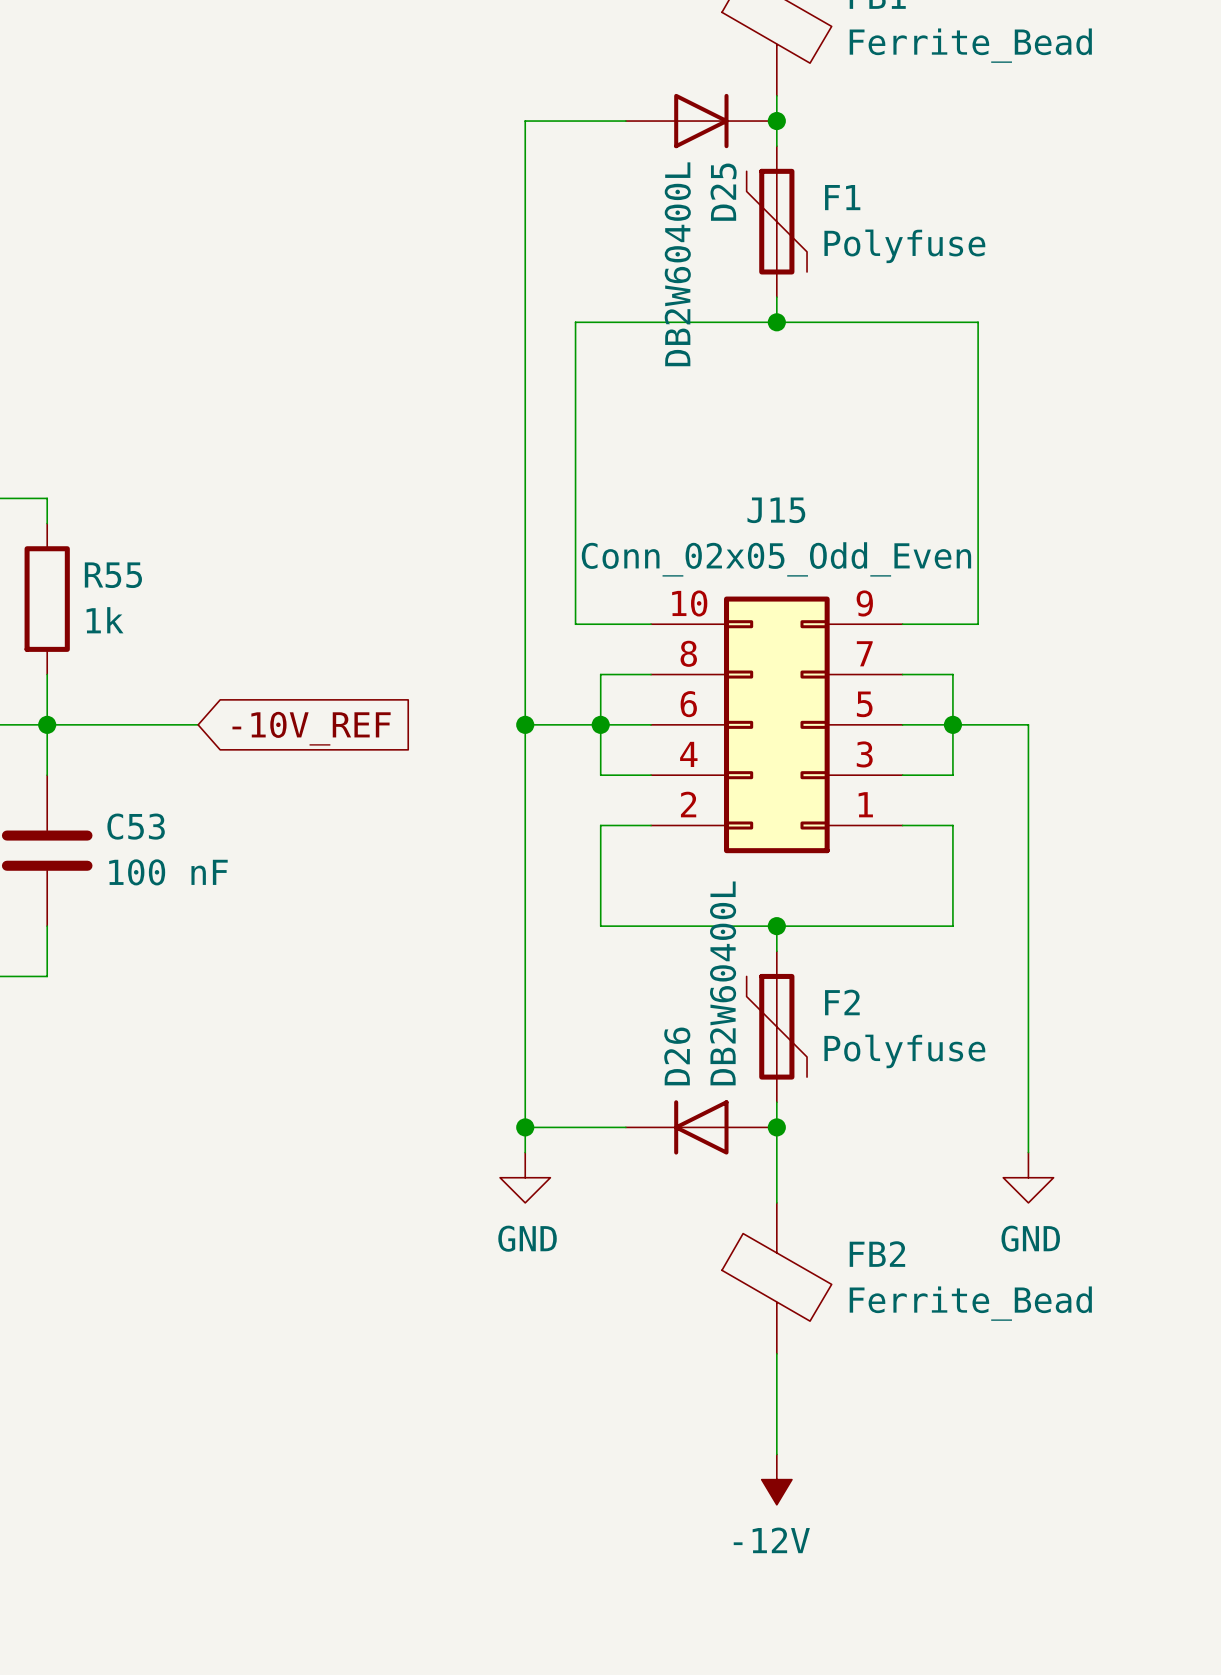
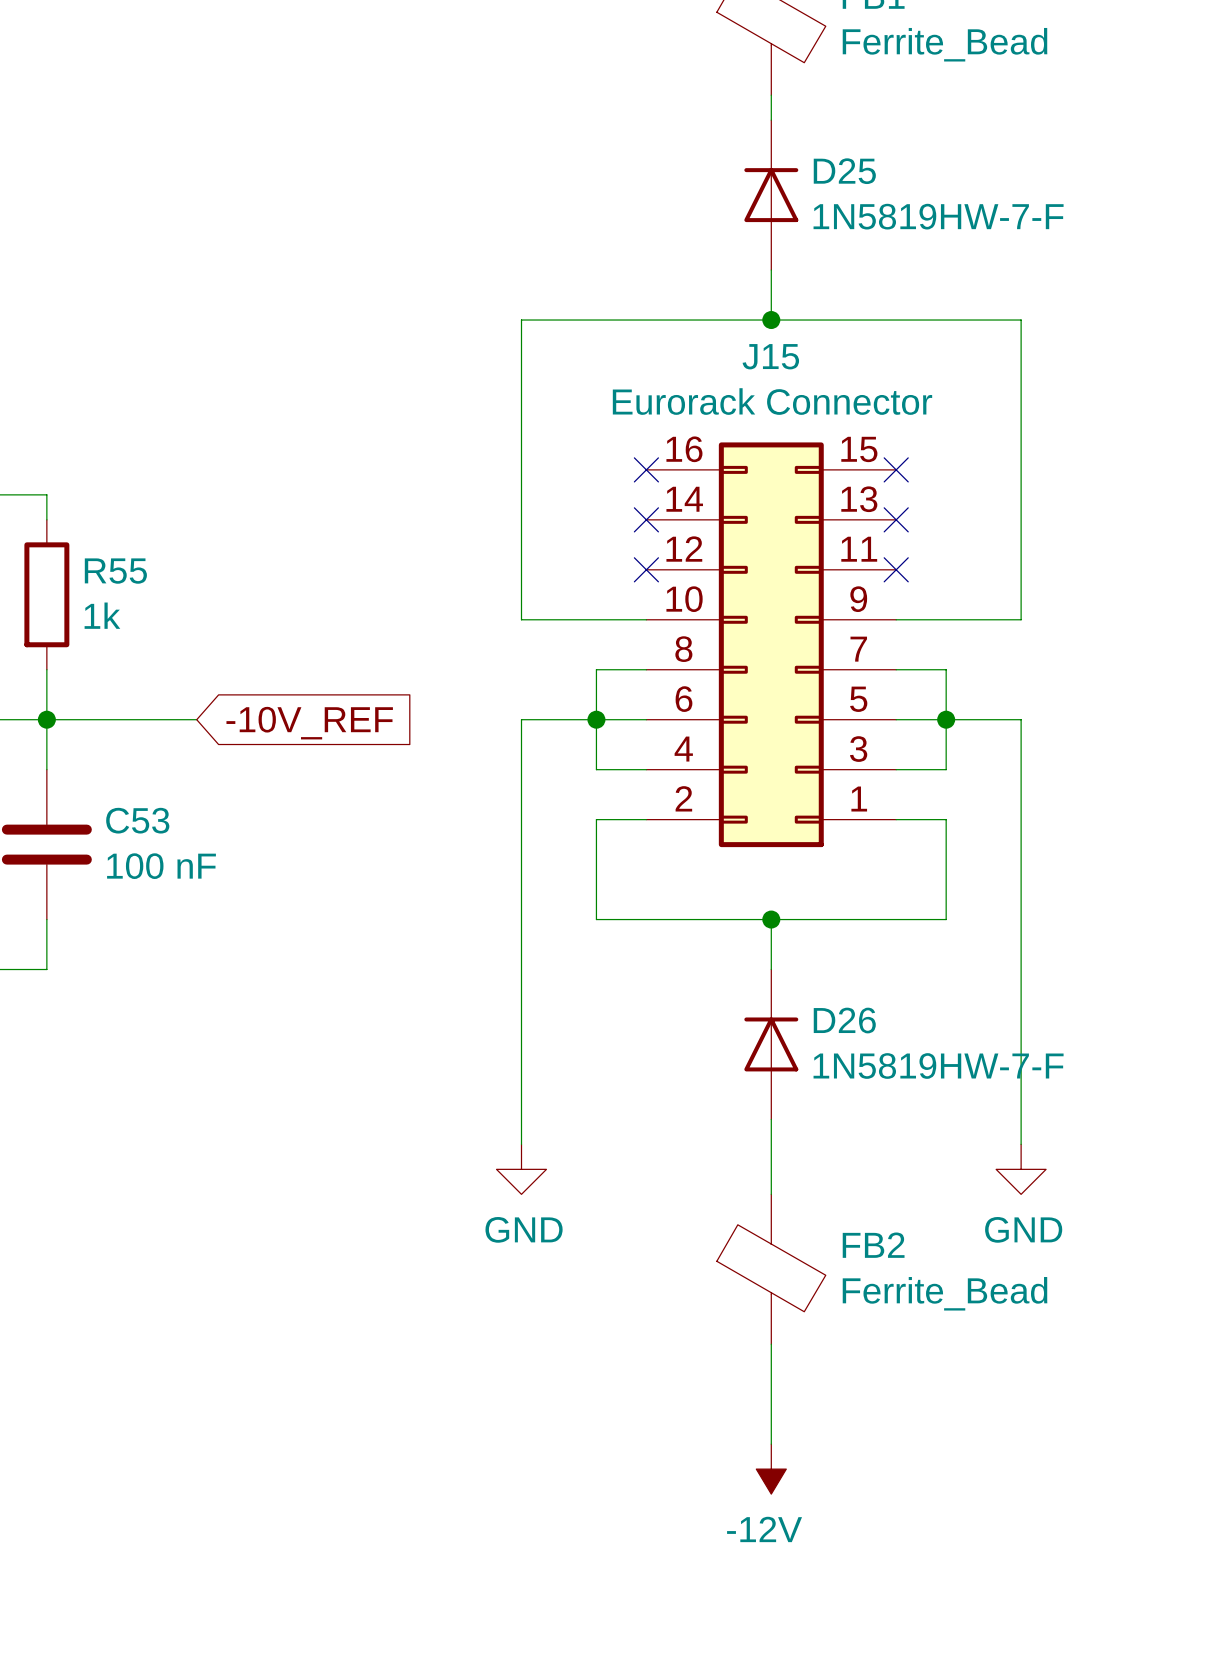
wire: (625, 121) (525, 121) (525, 322) -> (571, 320) (521, 320)
D25 rotation: 0° (701, 121) -> 90° counterclockwise (771, 195)
D25 position: (701, 121) -> (771, 195)
junction: (776, 121) -> none
F1: Polyfuse (776, 221) -> none
D25 value: DB2W60400L (677, 264) -> 1N5819HW-7-F (938, 216)
wire: (575, 322) (575, 624) -> none
wire: (978, 322) (978, 624) -> (971, 320) (1021, 320) (1021, 619) (971, 619)
no-connect mark: none -> (646, 469)
no-connect mark: none -> (896, 469)
J15 name position: J15 (776, 510) -> J15 (770, 356)
no-connect mark: none -> (646, 519)
no-connect mark: none -> (896, 519)
J15 value: Conn_02x05_Odd_Even (776, 559) -> Eurorack Connector (772, 401)
no-connect mark: none -> (646, 569)
no-connect mark: none -> (896, 569)
J15 symbol: [651, 596, 903, 854] -> [646, 442, 897, 848]
wire: (525, 624) (525, 724) -> (521, 619) (571, 619)
junction: (525, 724) -> none
D26 value: DB2W60400L (723, 983) -> 1N5819HW-7-F (938, 1065)
F2: Polyfuse (776, 1026) -> none
wire: (525, 1127) (625, 1127) -> none
junction: (525, 1127) -> none
D26 rotation: 0° (701, 1127) -> 90° clockwise (771, 1044)
D26 position: (701, 1127) -> (771, 1044)
junction: (776, 1127) -> none

